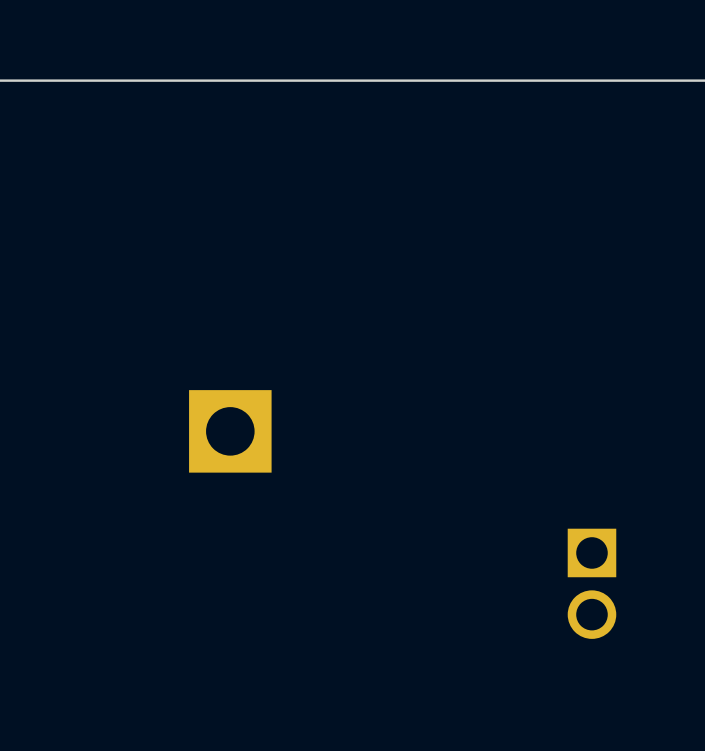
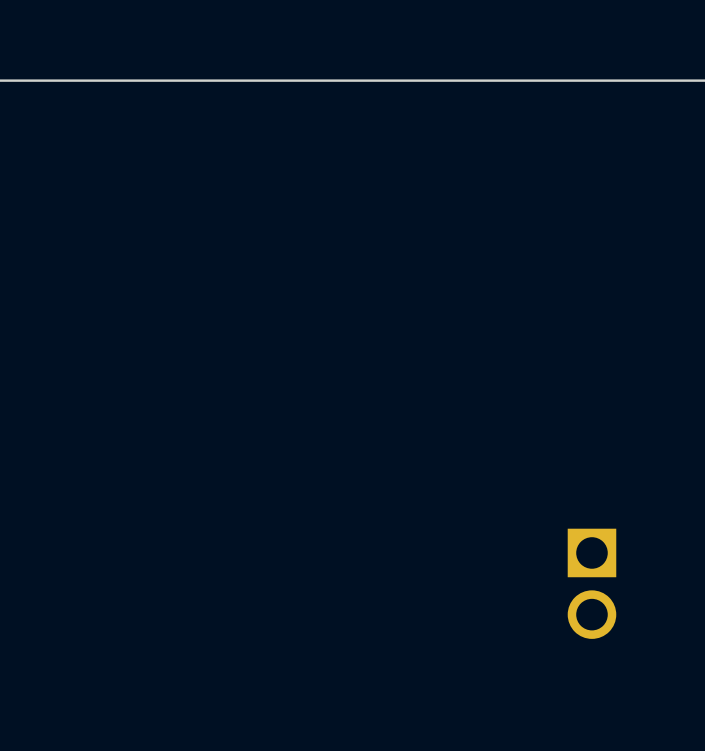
part: (230, 431) -> none

